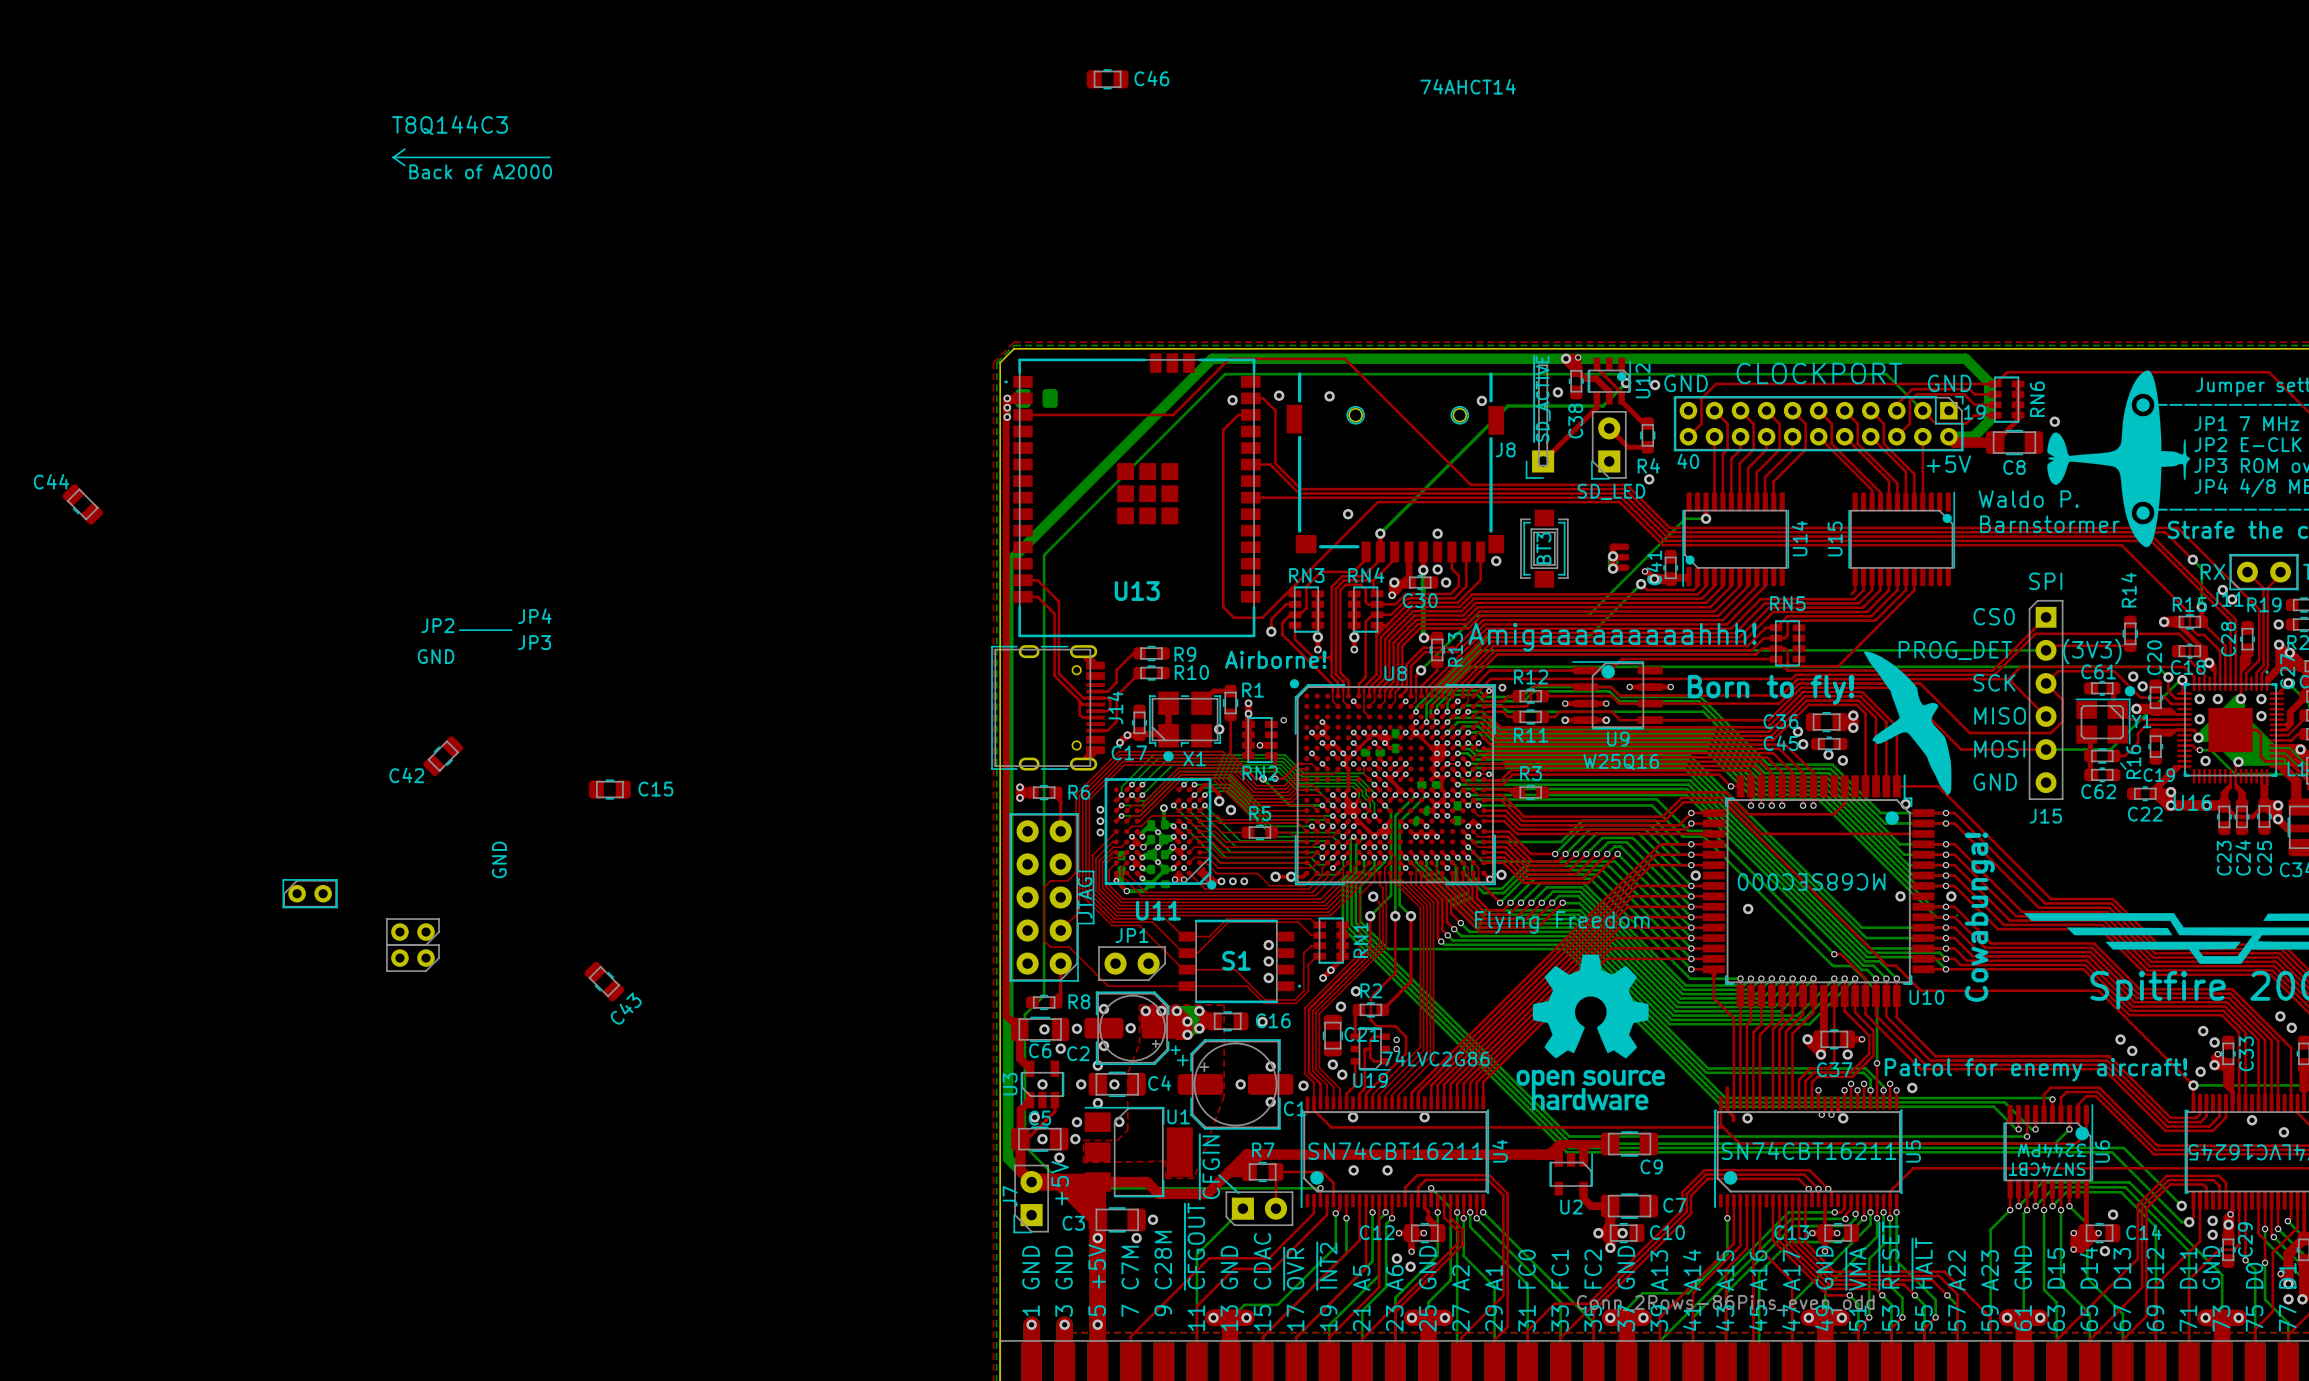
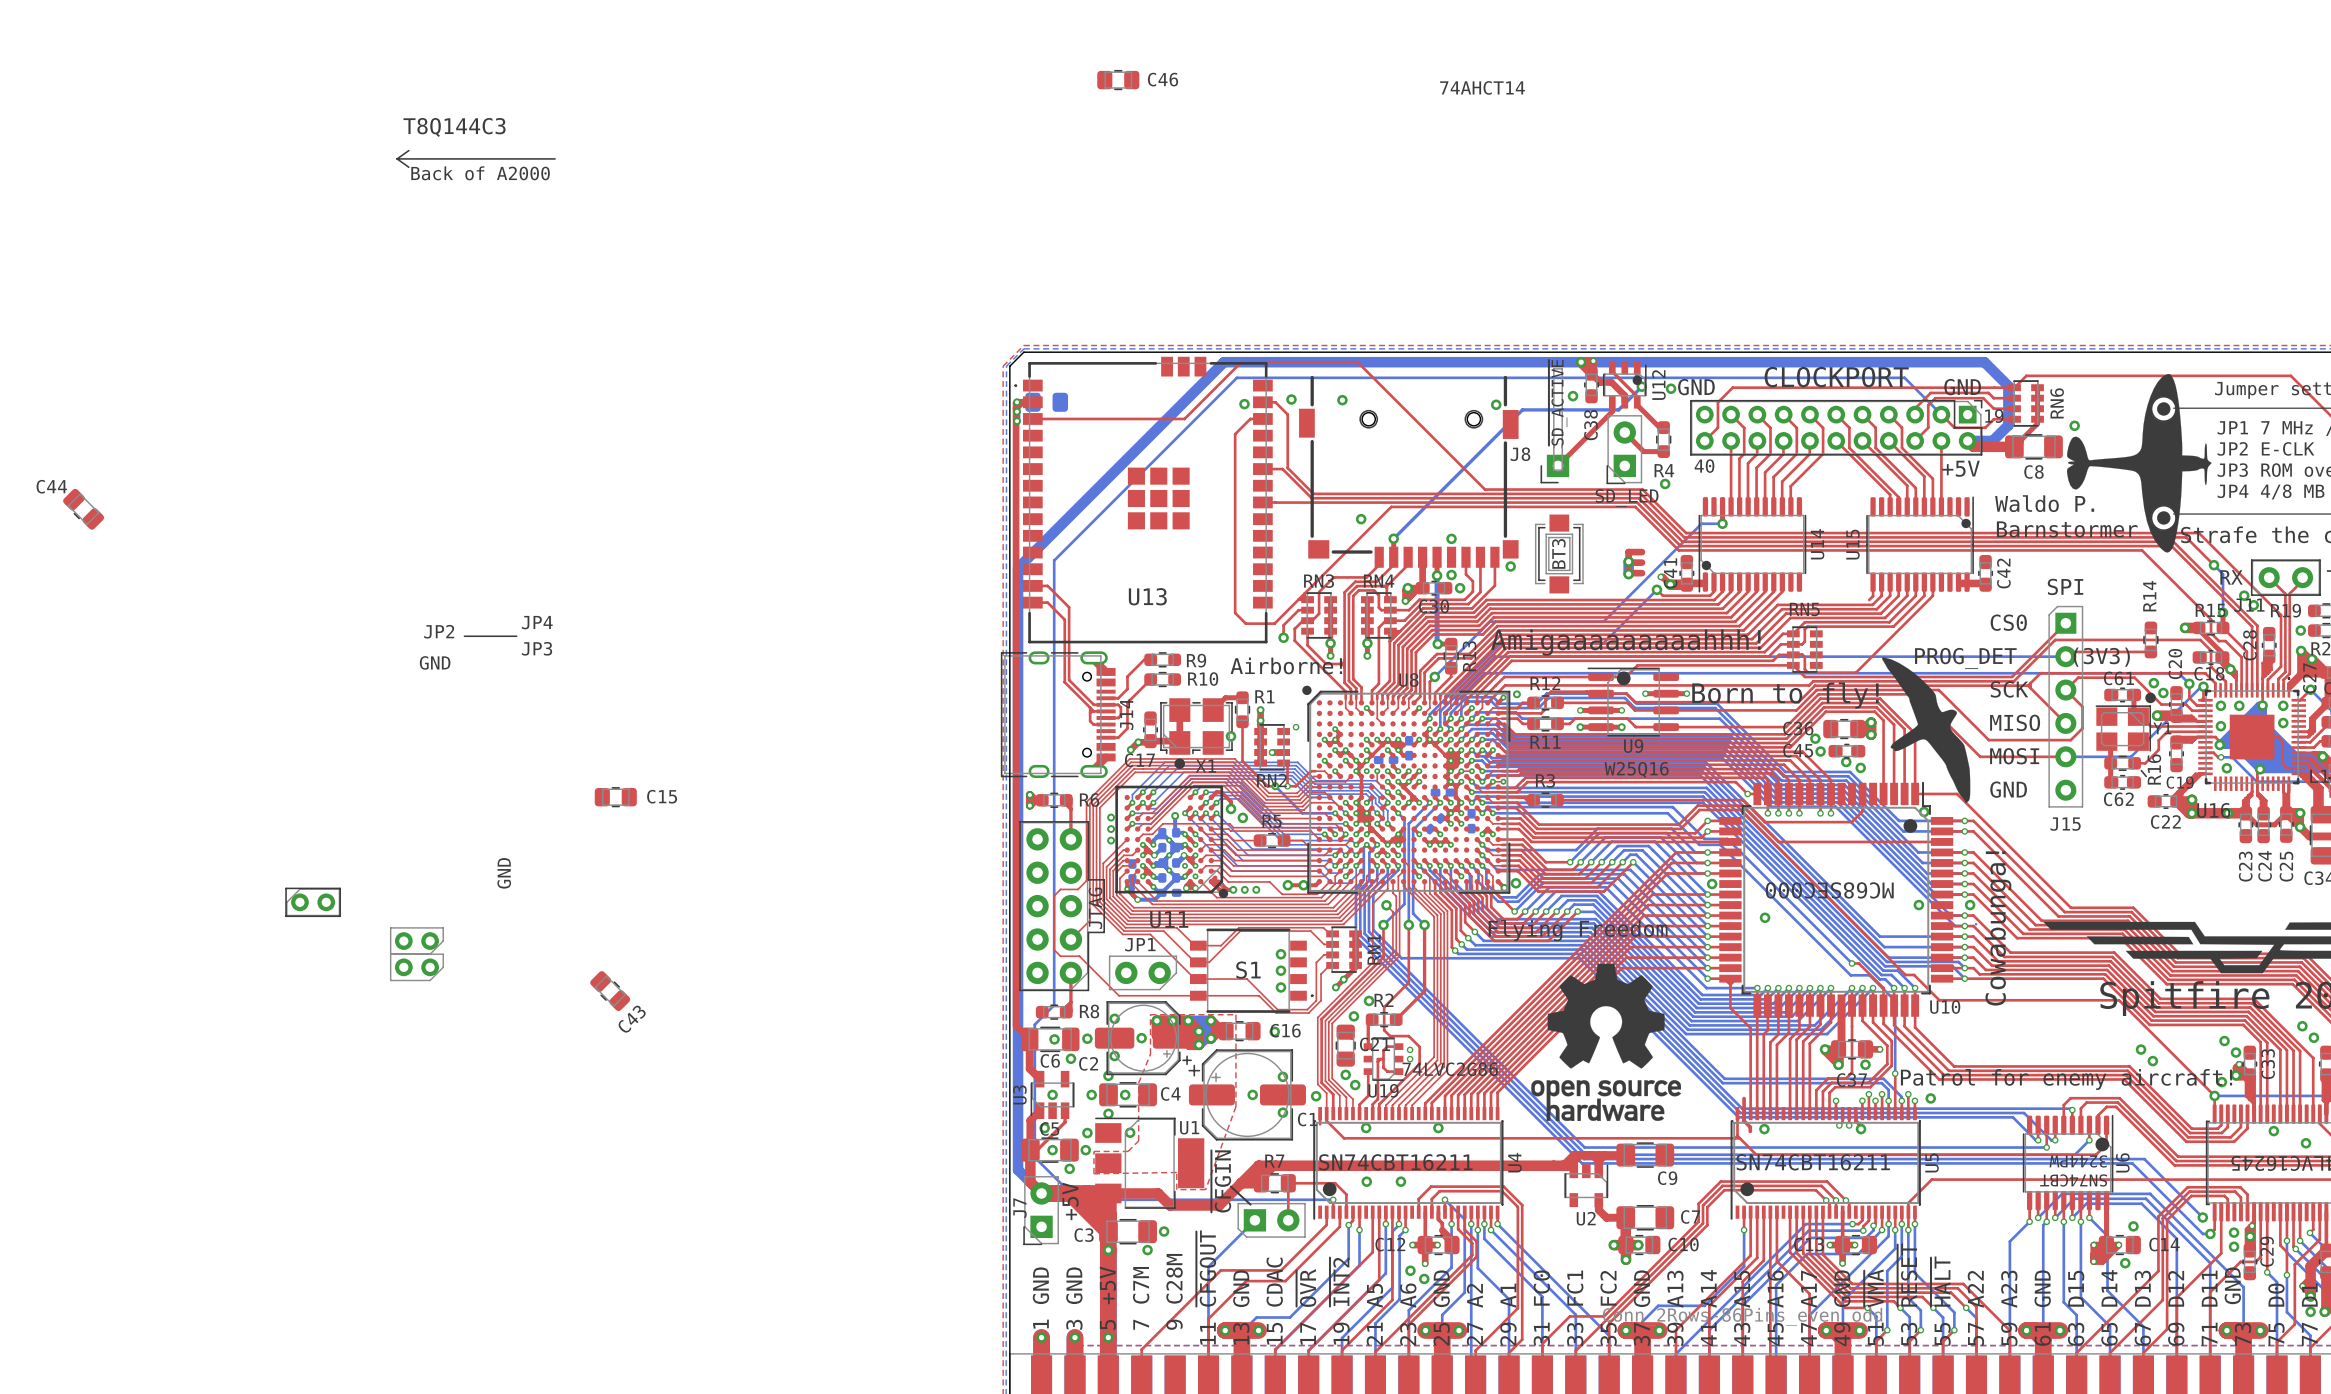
top track: none -> (1958, 582) (1961, 584) (1985, 584) (1983, 582) (1958, 582)
C42 footprint: [423, 736, 464, 776] -> [1978, 554, 1994, 592]
C42 name position: C42 (406, 775) -> C42 (2003, 573)

